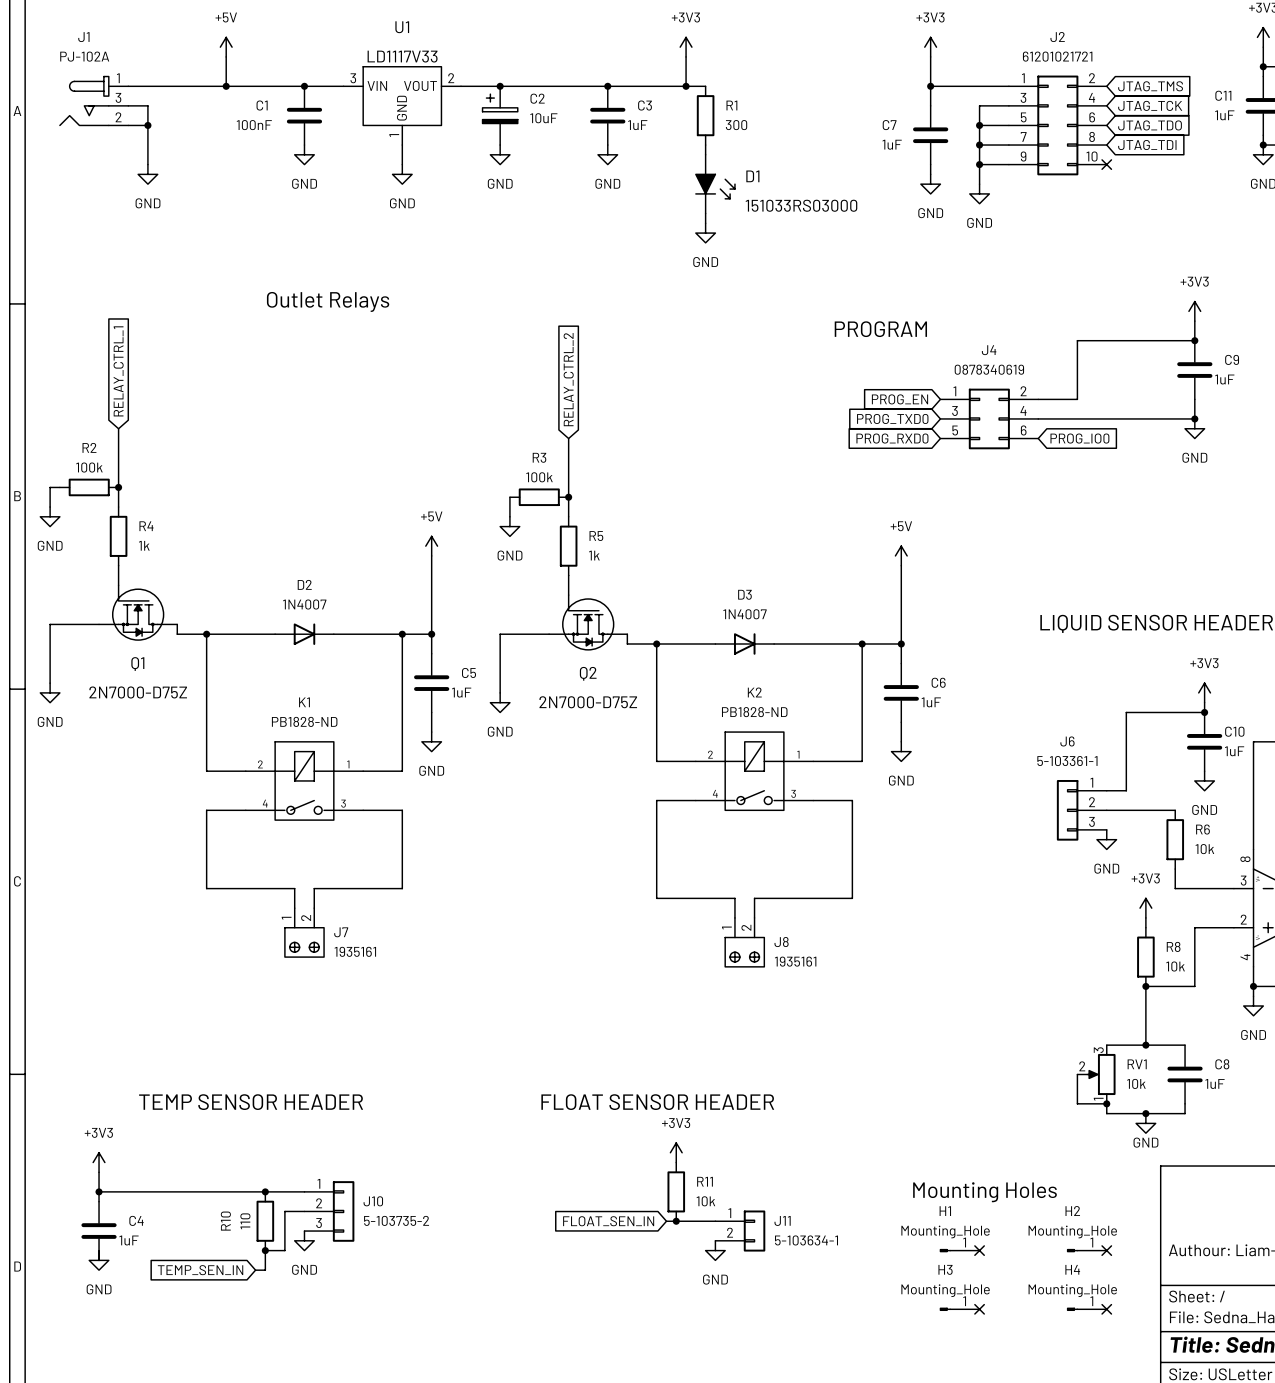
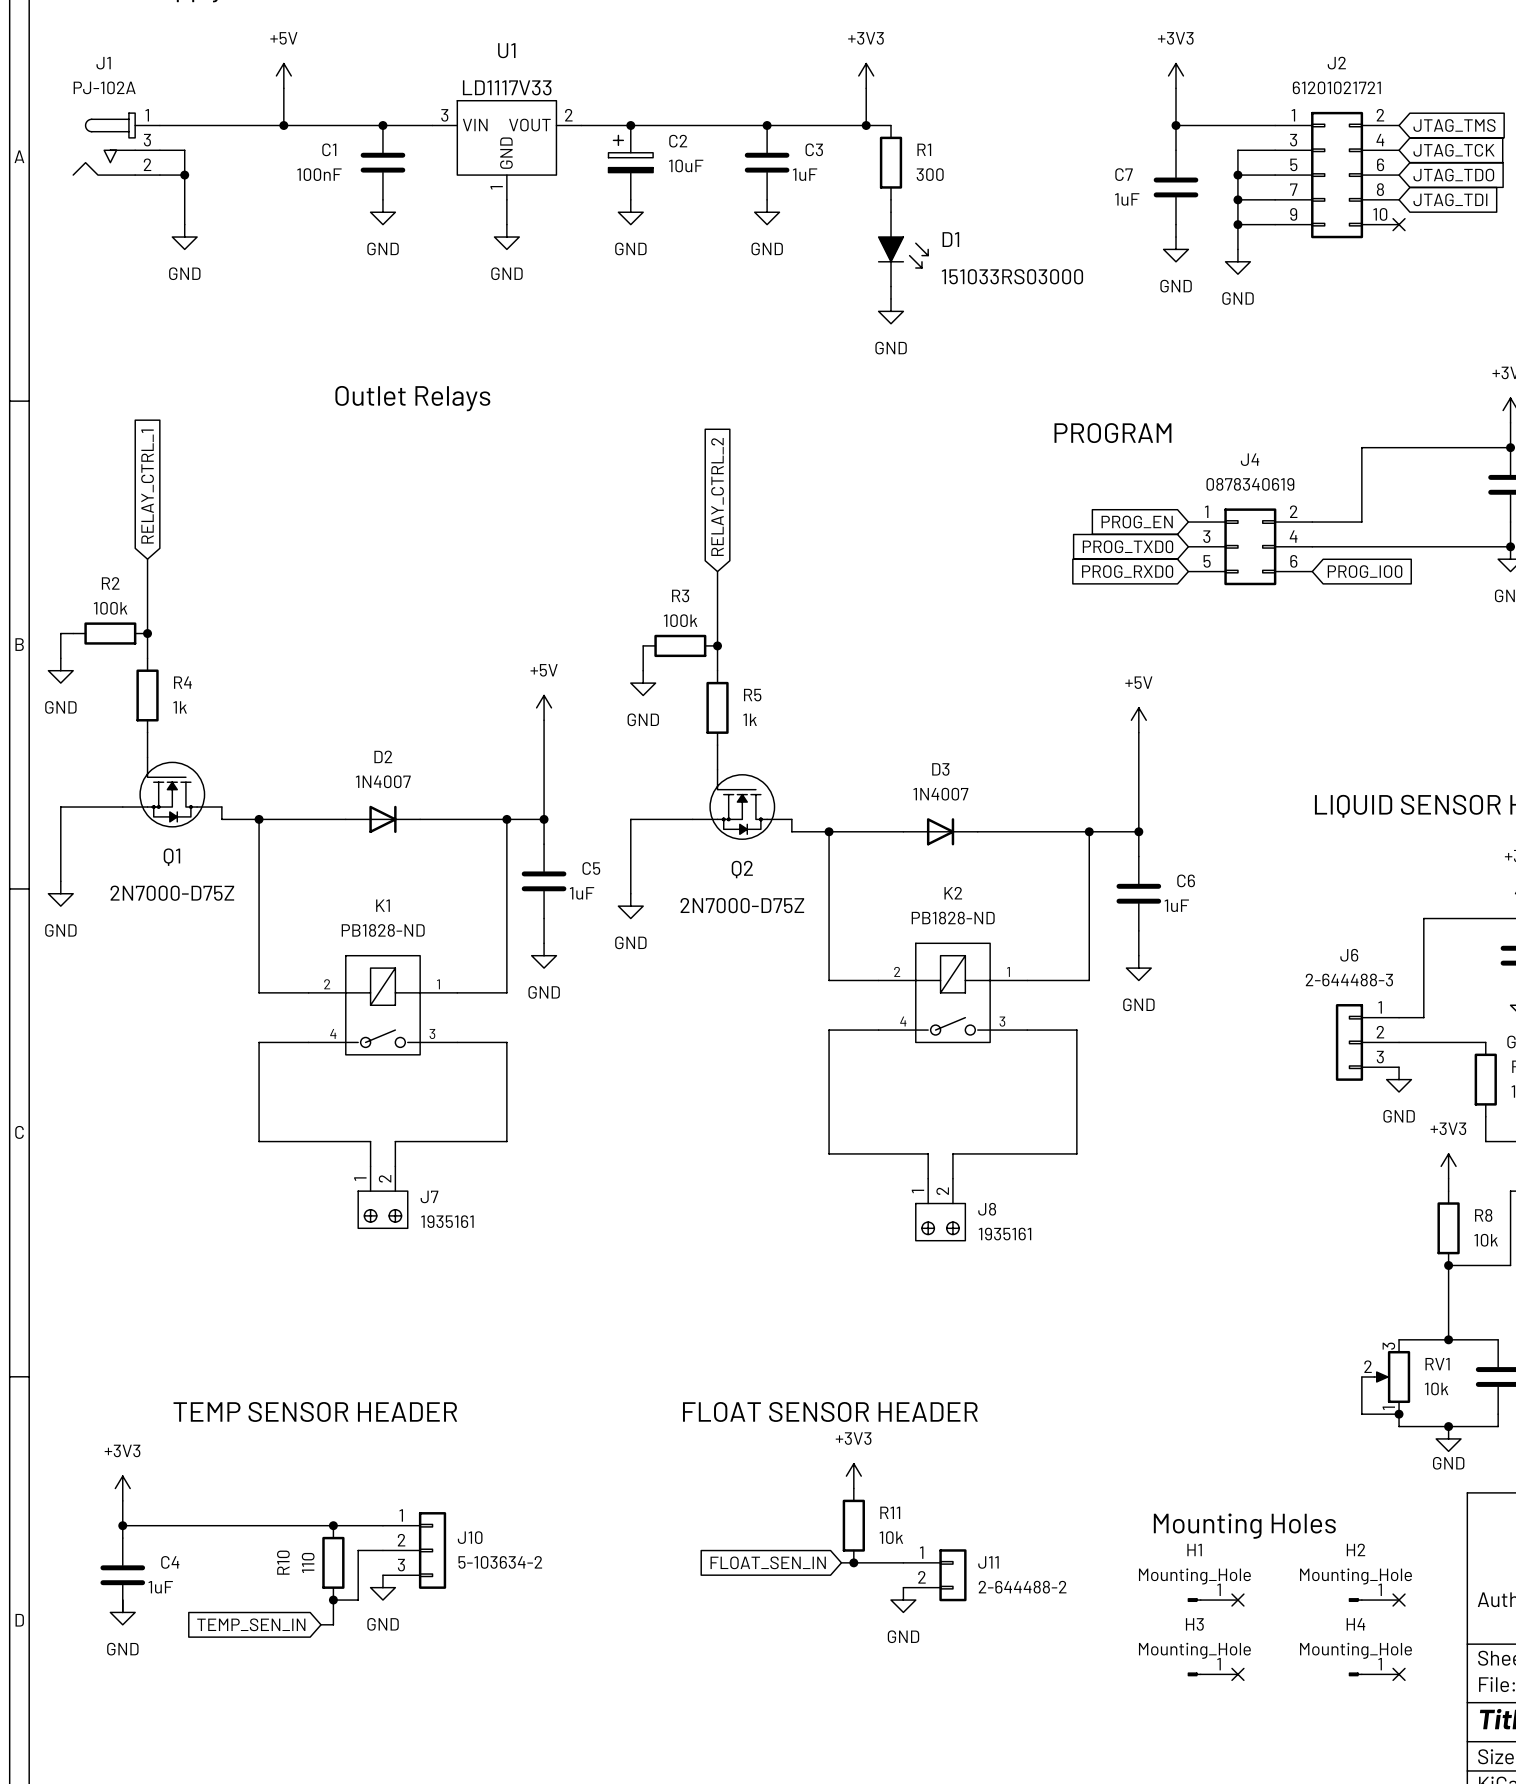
J6 value: 5-103361-1 (1067, 761) -> 2-644488-3 (1349, 980)
J10 value: 5-103735-2 (396, 1220) -> 5-103634-2 (500, 1562)
J11 value: 5-103634-1 (806, 1240) -> 2-644488-2 (1022, 1587)

